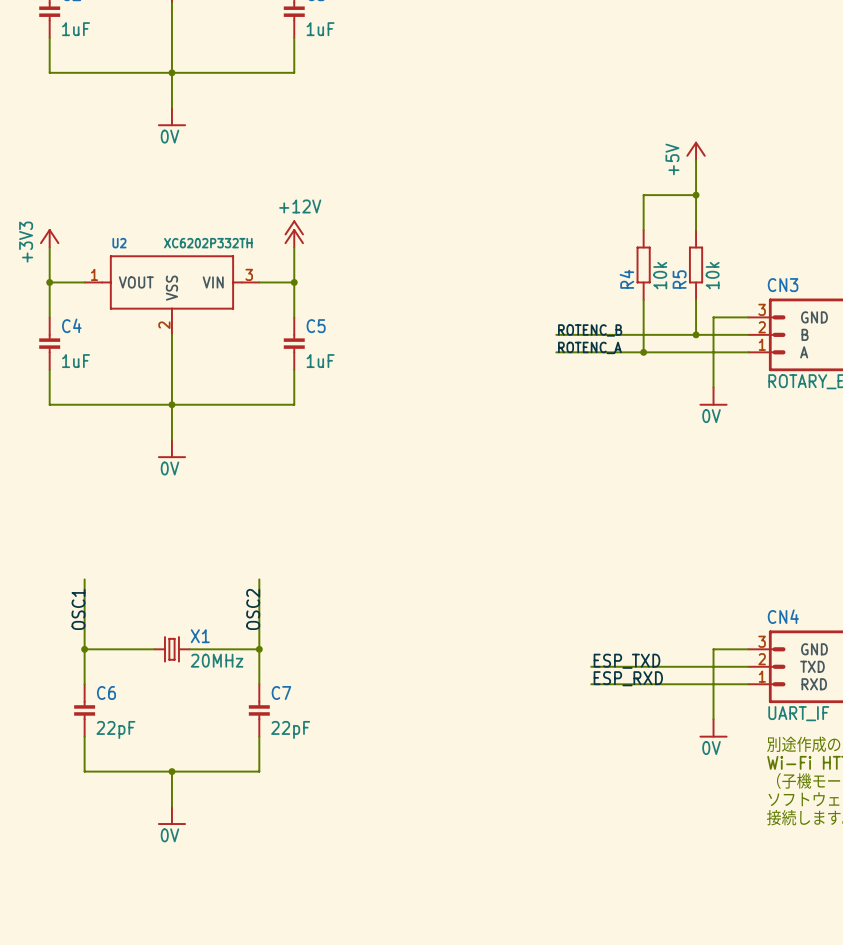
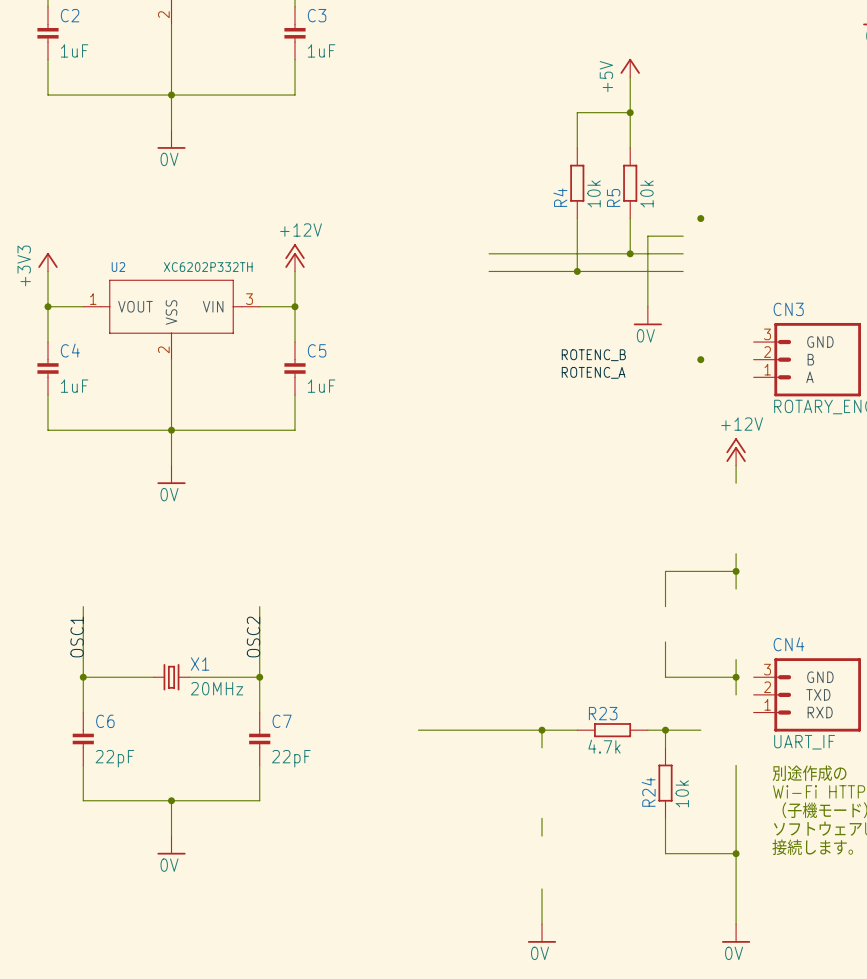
wire: none -> (630, 112) (577, 112) (577, 147)
junction: none -> (630, 112)
power symbol position: +5V (696, 151) -> +5V (630, 68)
wire: (696, 160) (696, 230) -> (630, 77) (630, 147)
wire: (696, 195) (643, 195) (643, 212) -> (683, 236) (647, 236)
junction: none -> (630, 253)
wire: none -> (647, 253) (647, 306)
junction: none -> (577, 271)
R4 position: (643, 264) -> (577, 183)
R5 position: (696, 264) -> (630, 183)
wire: (643, 299) (643, 352) -> (577, 218) (577, 271)
wire: (696, 299) (696, 334) -> (630, 218) (630, 253)
wire: (748, 317) (713, 317) (713, 387) -> none
wire: (556, 334) (748, 334) -> (489, 253) (683, 253)
wire: (556, 352) (748, 352) -> (489, 271) (683, 271)
junction: (643, 352) -> none
power symbol position: 0V (713, 396) -> 0V (647, 316)
power symbol: none -> +12V (736, 451)
wire: none -> (736, 465) (736, 483)
wire: none -> (736, 553) (736, 589)
wire: none -> (736, 571) (665, 571) (665, 606)
junction: none -> (736, 571)
wire: none -> (736, 659) (736, 694)
wire: (713, 649) (713, 719) -> (718, 677) (665, 677) (665, 641)
wire: (730, 649) (748, 649) -> none
junction: none -> (736, 677)
label: ESP_TXD (626, 661) -> none
wire: (591, 666) (748, 666) -> none
label: ESP_RXD (628, 678) -> none
wire: (591, 684) (748, 684) -> none
wire: none -> (418, 730) (577, 730)
wire: none -> (542, 730) (542, 747)
junction: none -> (542, 730)
R23: none -> 4.7k (612, 730)
wire: none -> (647, 730) (700, 730)
wire: none -> (665, 730) (665, 747)
junction: none -> (665, 730)
power symbol: 0V (713, 728) -> none
wire: none -> (736, 765) (736, 924)
R24: none -> 10k (665, 783)
wire: none -> (542, 818) (542, 836)
wire: none -> (665, 818) (665, 853) (736, 853)
junction: none -> (736, 853)
wire: none -> (542, 888) (542, 924)
power symbol: none -> 0V (542, 933)
power symbol: none -> 0V (736, 933)

